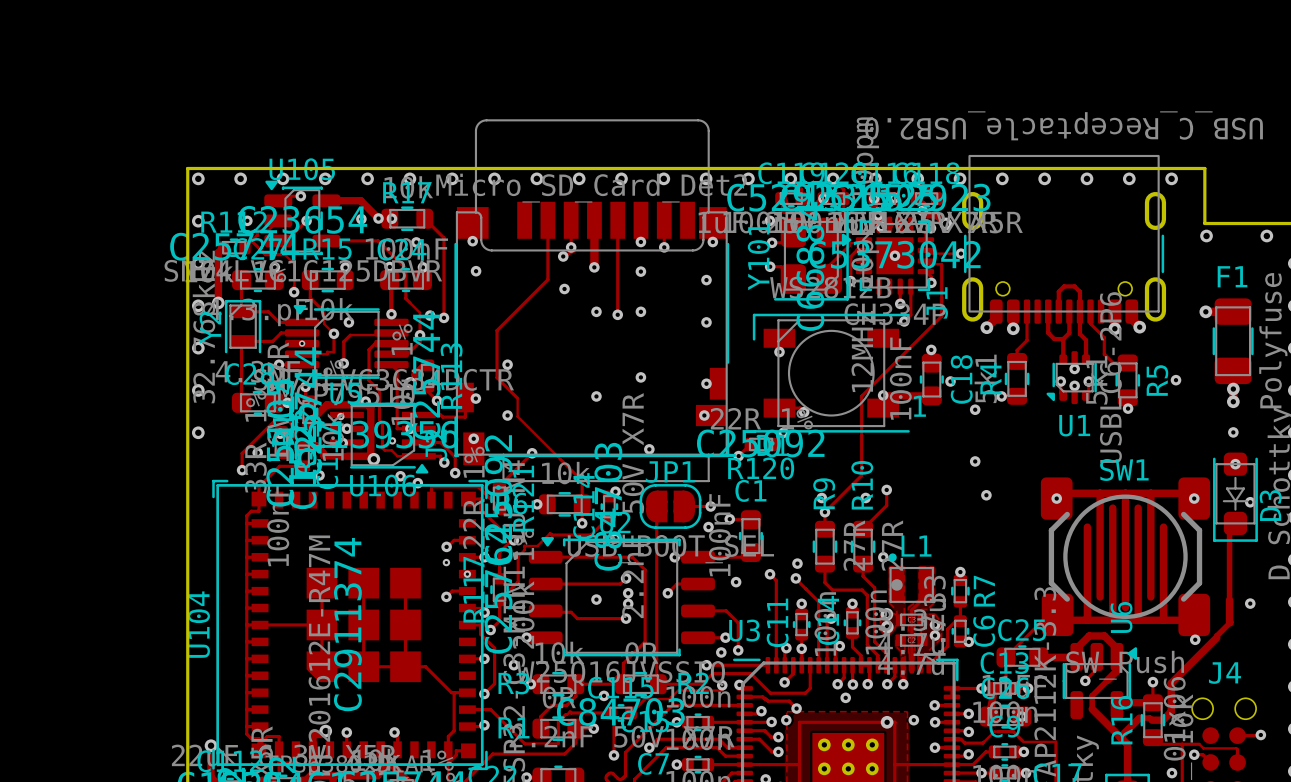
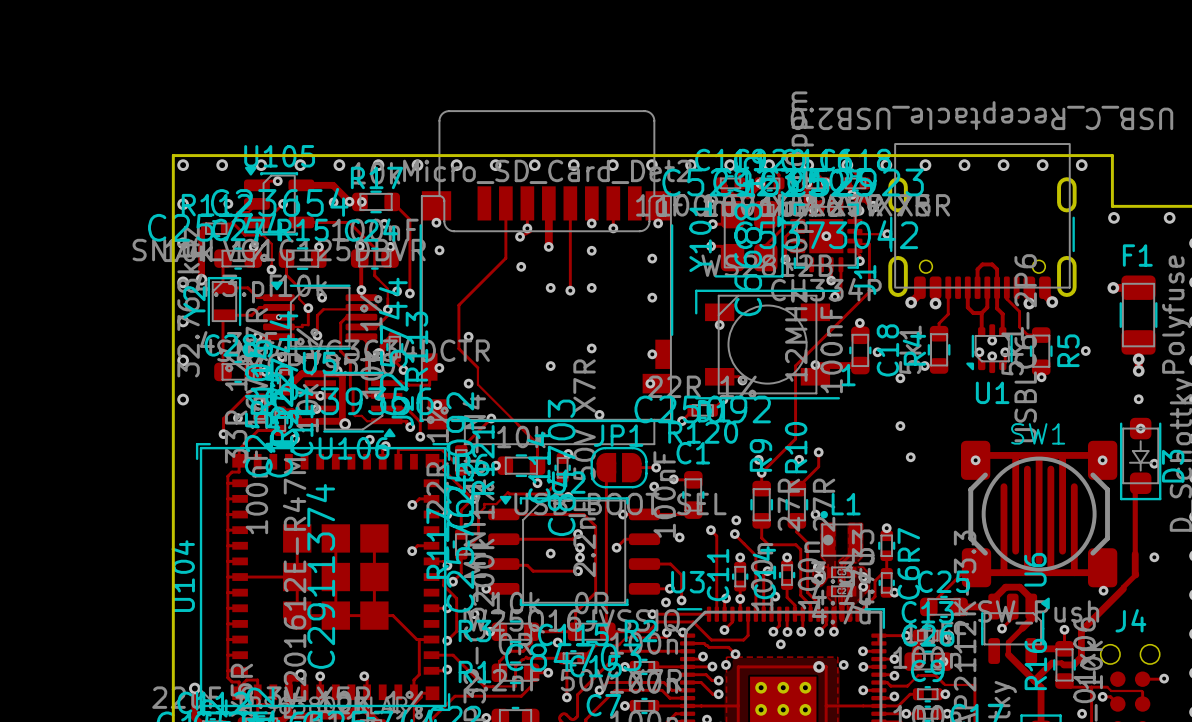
via: (340, 416) -> none
via: (392, 440) -> none
via: (446, 562) -> none
via: (467, 574) -> none

